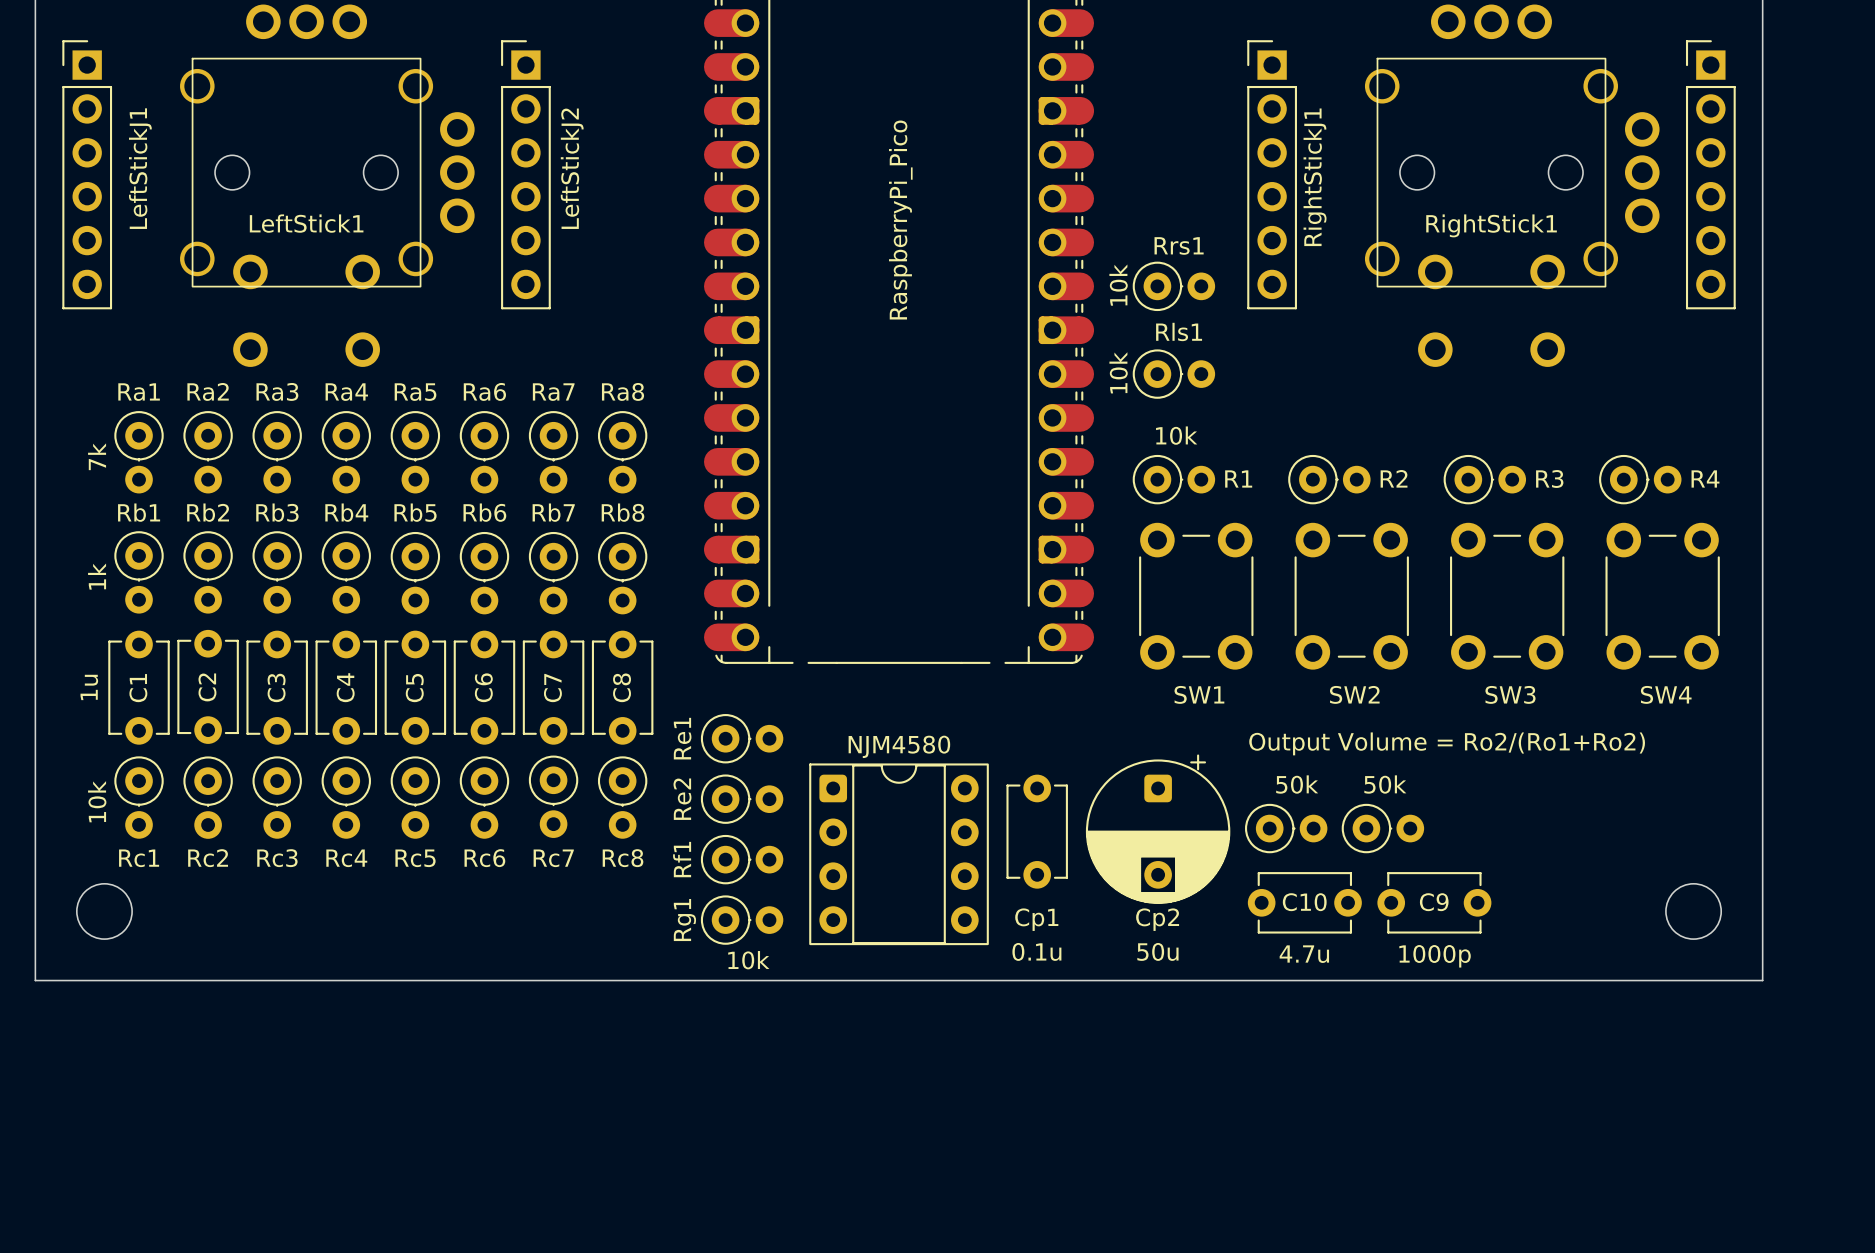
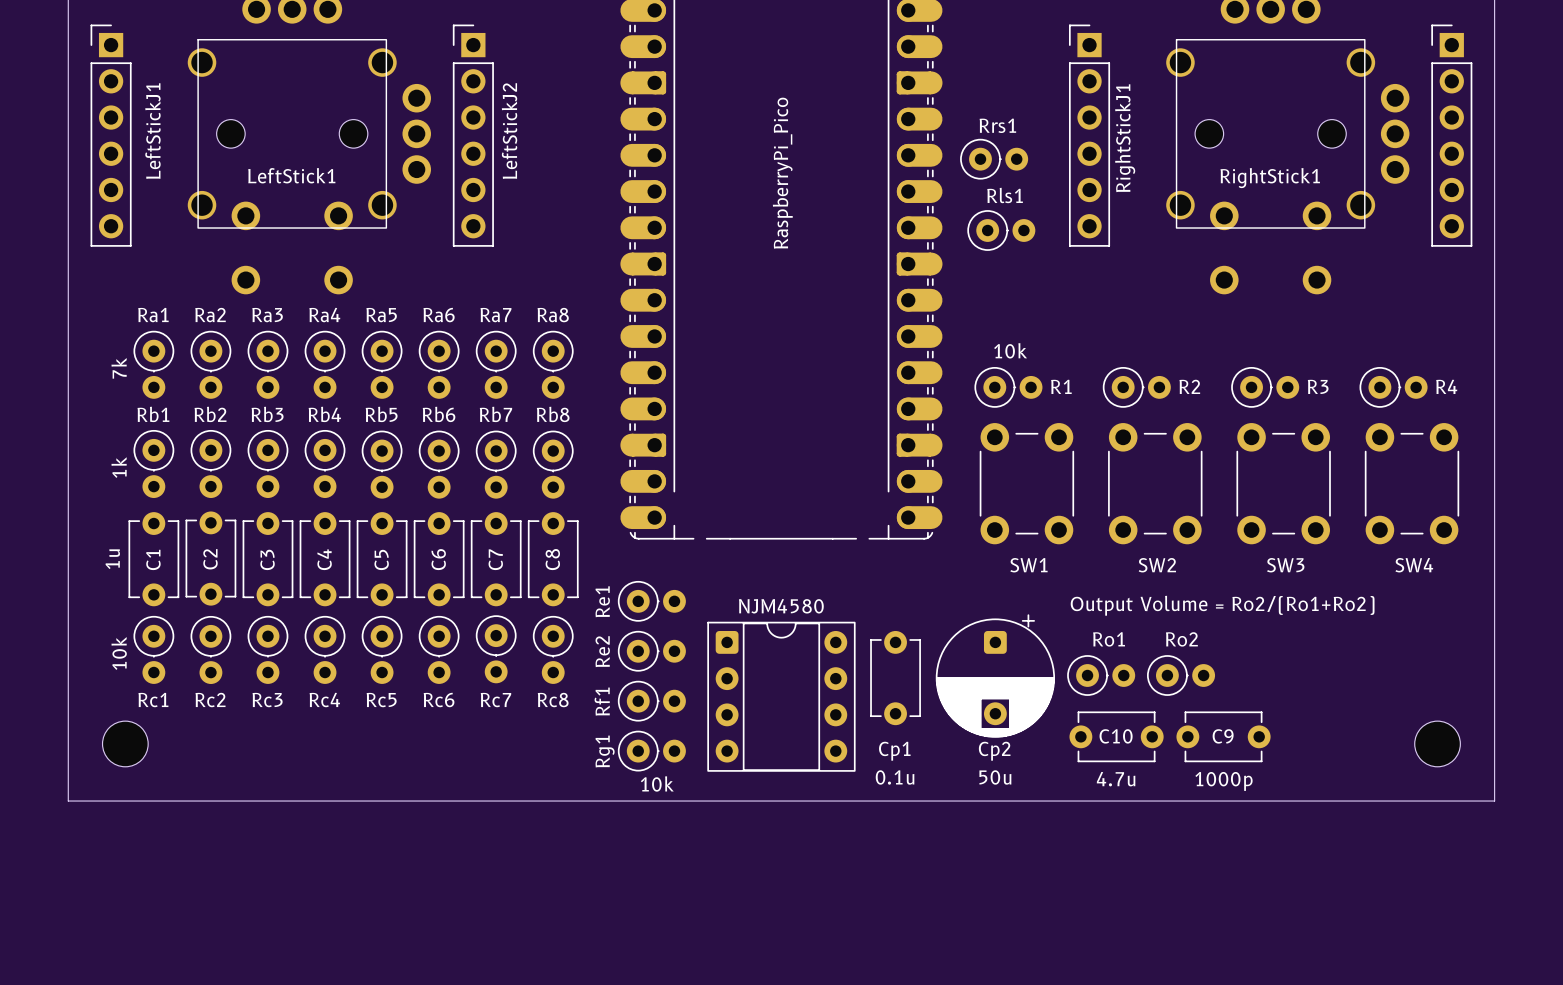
Rrs1 value: 10k (1118, 285) -> none
Rrs1 position: (1173, 286) -> (994, 159)
Rls1 value: 10k (1118, 372) -> none
Rls1 position: (1173, 374) -> (1001, 230)
part value: 50k (1297, 784) -> Ro1 (1109, 639)
part value: 50k (1385, 784) -> Ro2 (1181, 639)

